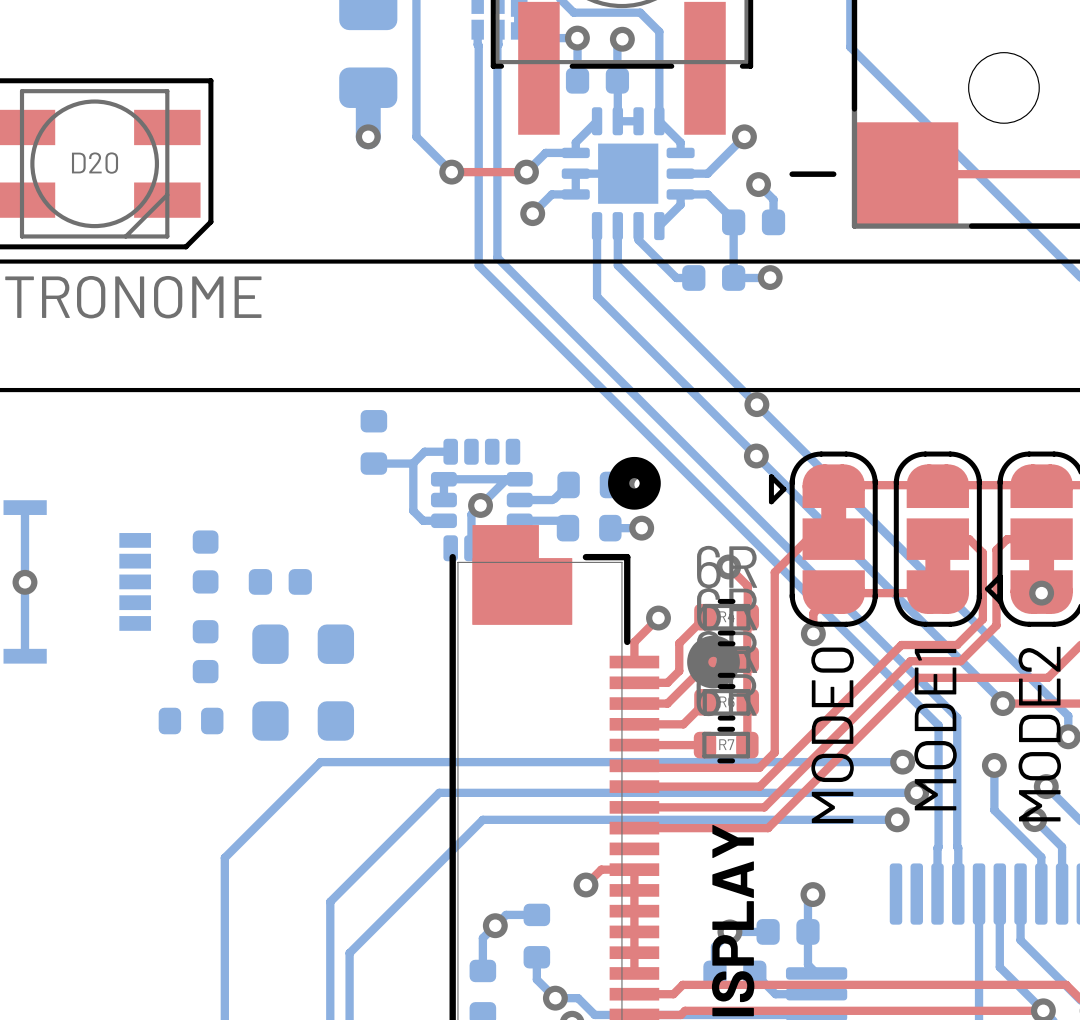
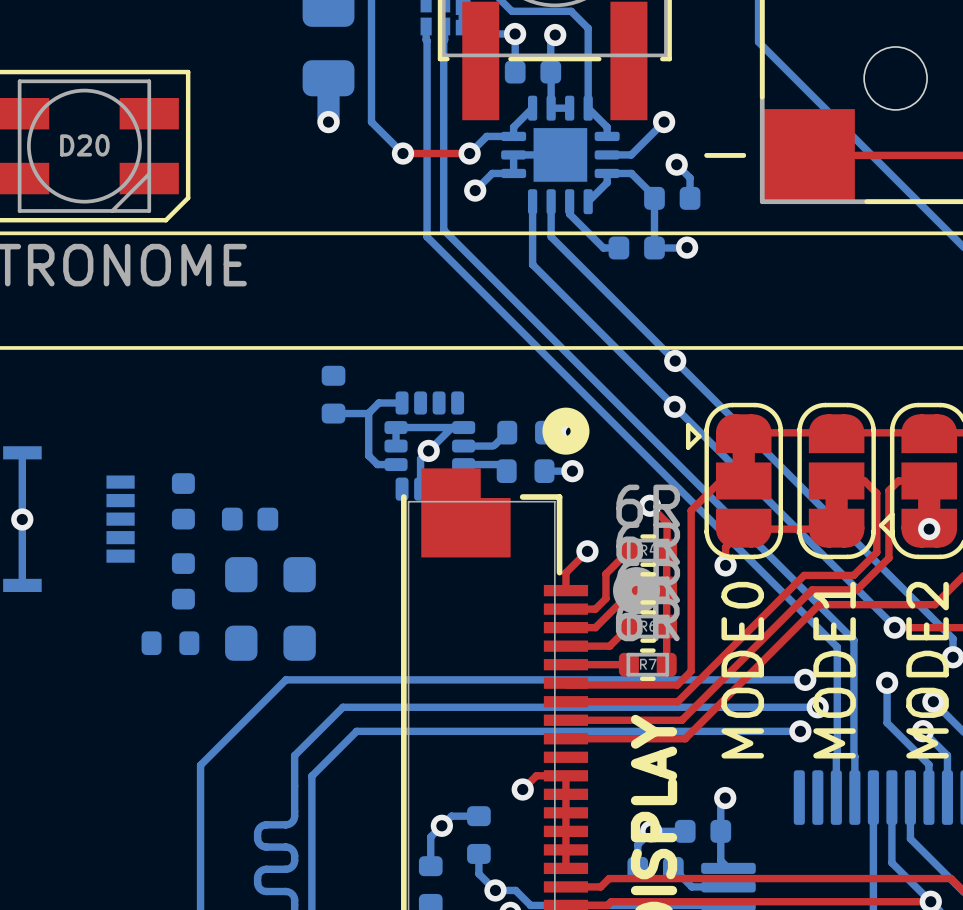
bottom track: (439, 792) (330, 901) -> (391, 707) (342, 707) (294, 755) (294, 804)
bottom track: (482, 819) (349, 953) -> (430, 731) (356, 731) (311, 776) (311, 850)
bottom track: (330, 914) (330, 959) -> (294, 815) (289, 823) (263, 825) (259, 828) (257, 833) (258, 841) (261, 845) (288, 847) (293, 851) (294, 855)
bottom track: (330, 964) (330, 1009) -> (294, 860) (289, 868) (263, 869) (259, 872) (257, 878) (258, 885) (261, 890) (288, 892) (293, 895) (294, 900)

